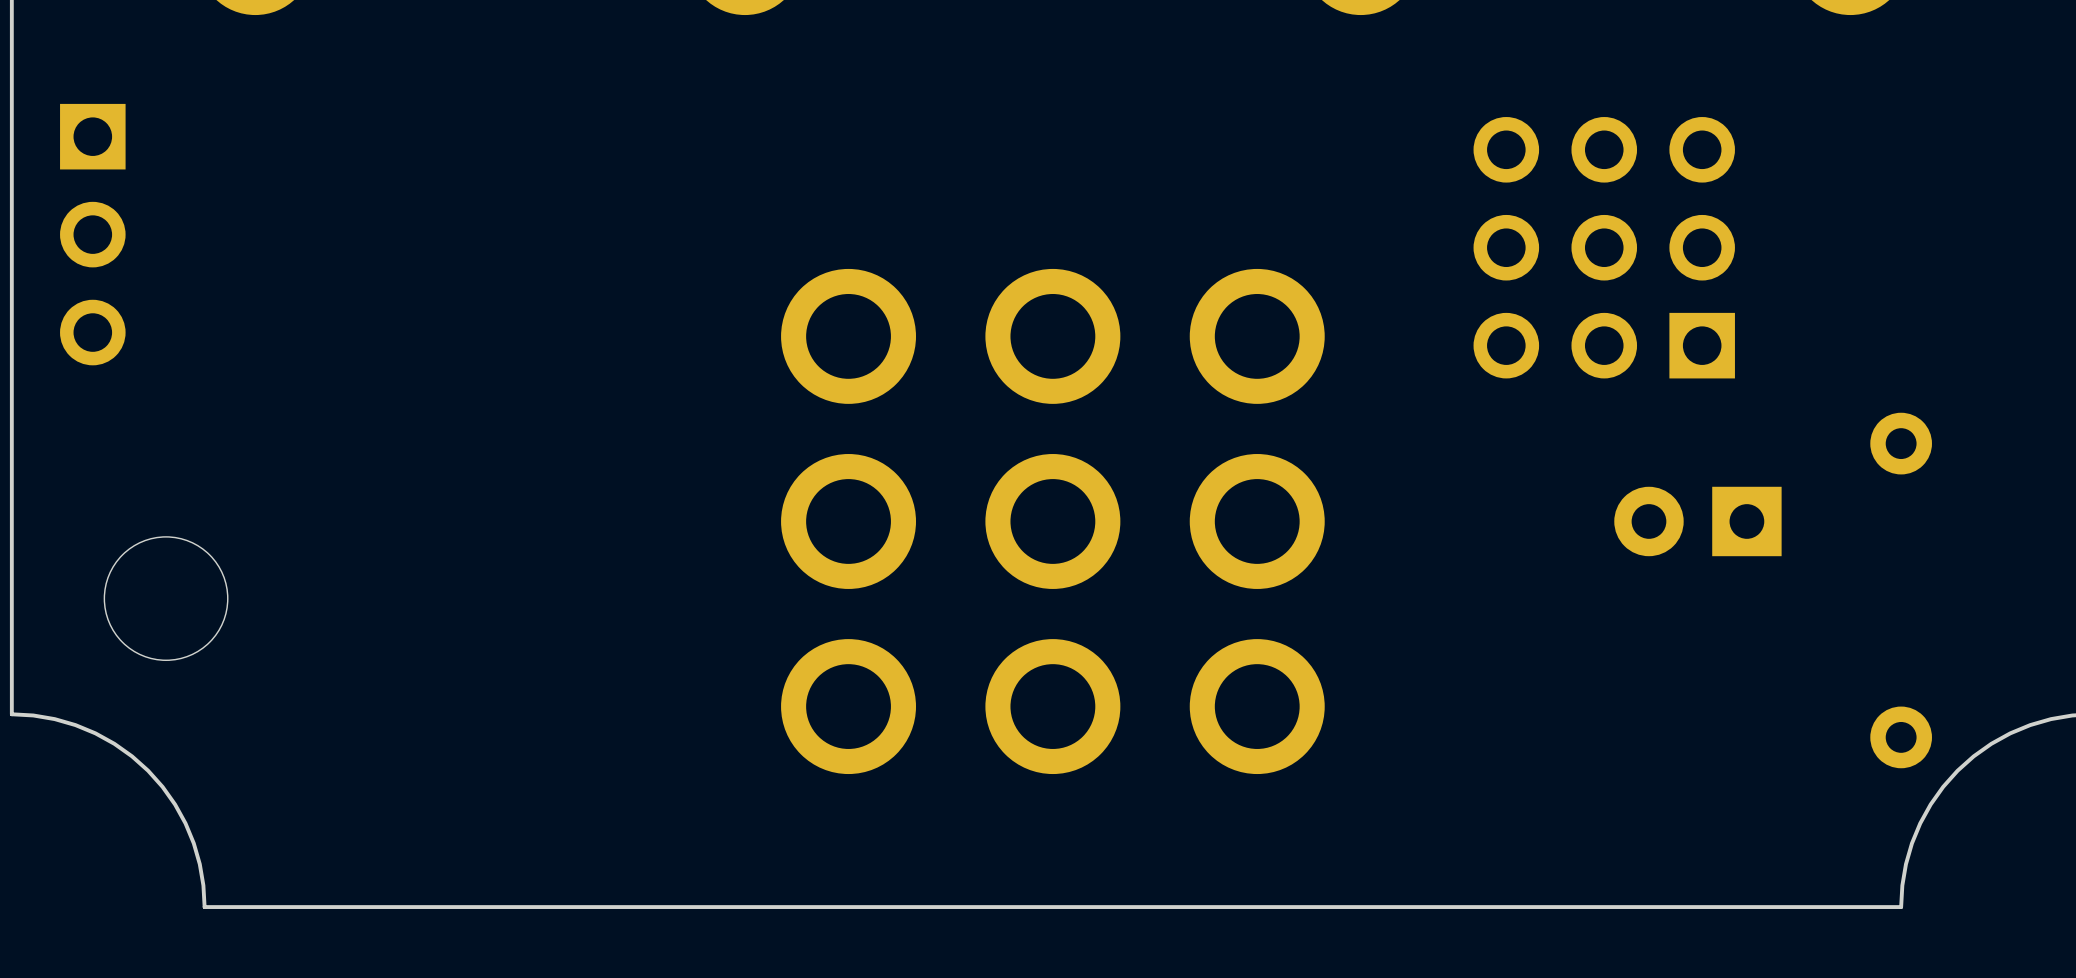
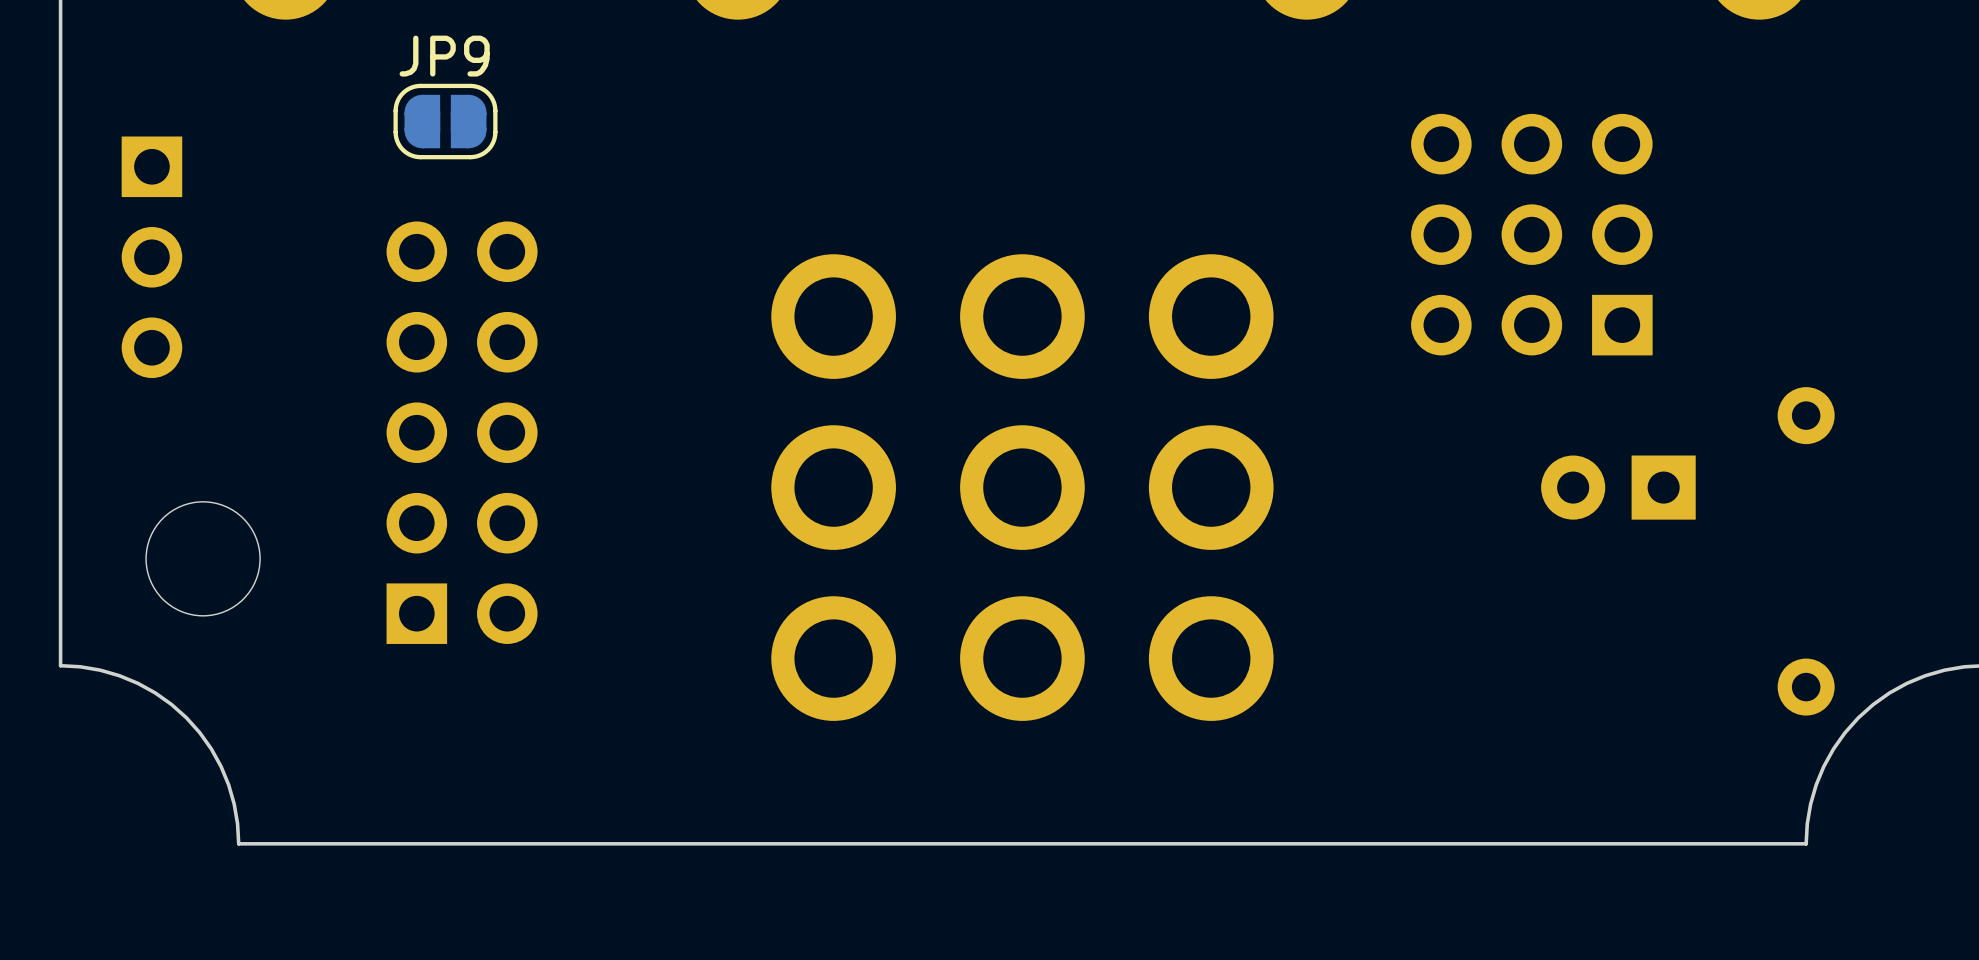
JP9: none -> (445, 121)
part position: (92, 234) -> (151, 257)
part: none -> (462, 432)

